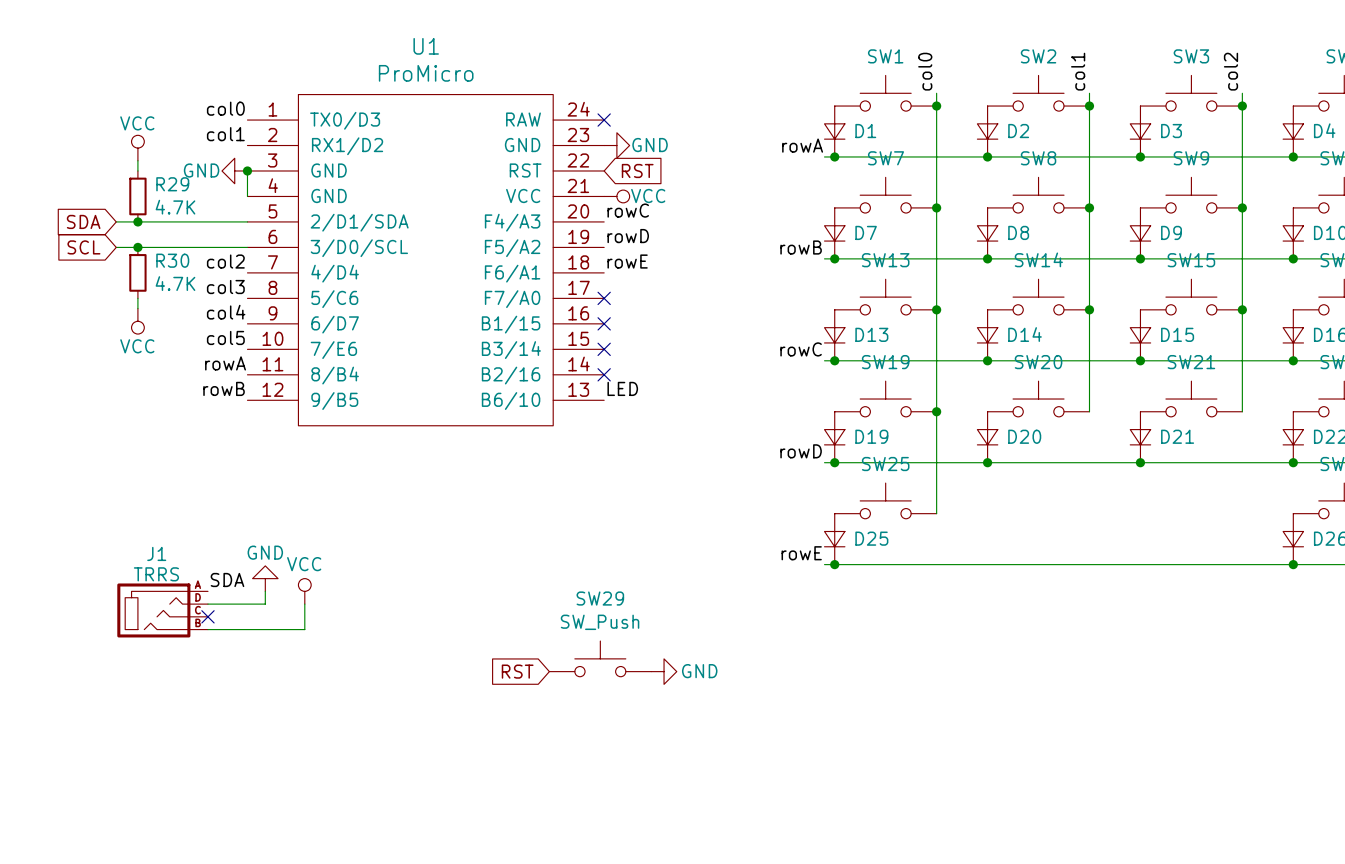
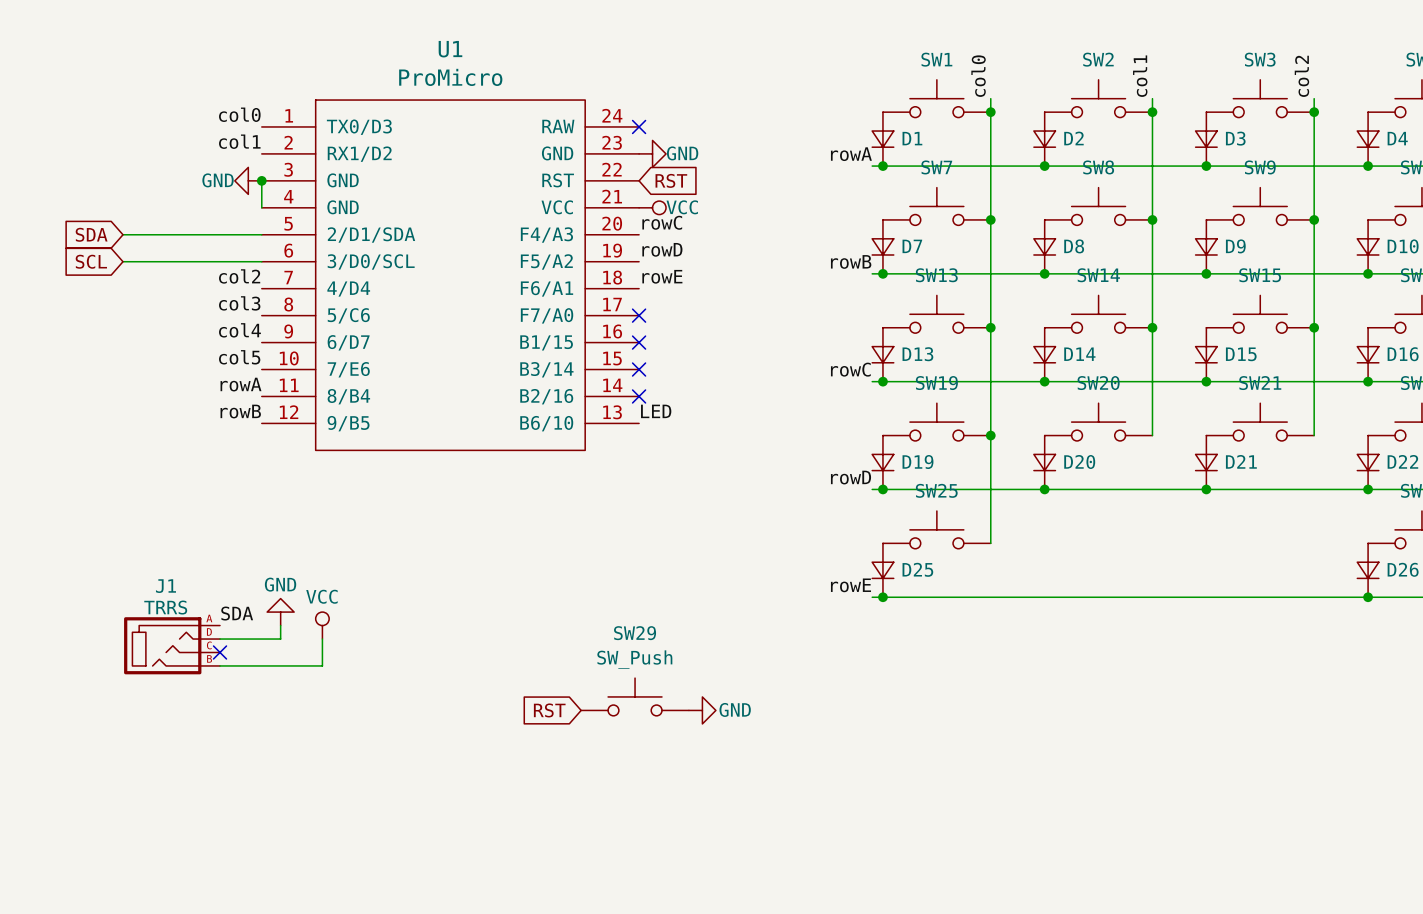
power symbol: VCC (137, 148) -> none
wire: (137, 160) (137, 170) -> none
R29: 4.7K (137, 196) -> none
junction: (137, 221) -> none
junction: (137, 247) -> none
R30: 4.7K (137, 272) -> none
wire: (137, 298) (137, 308) -> none
power symbol: VCC (137, 321) -> none

